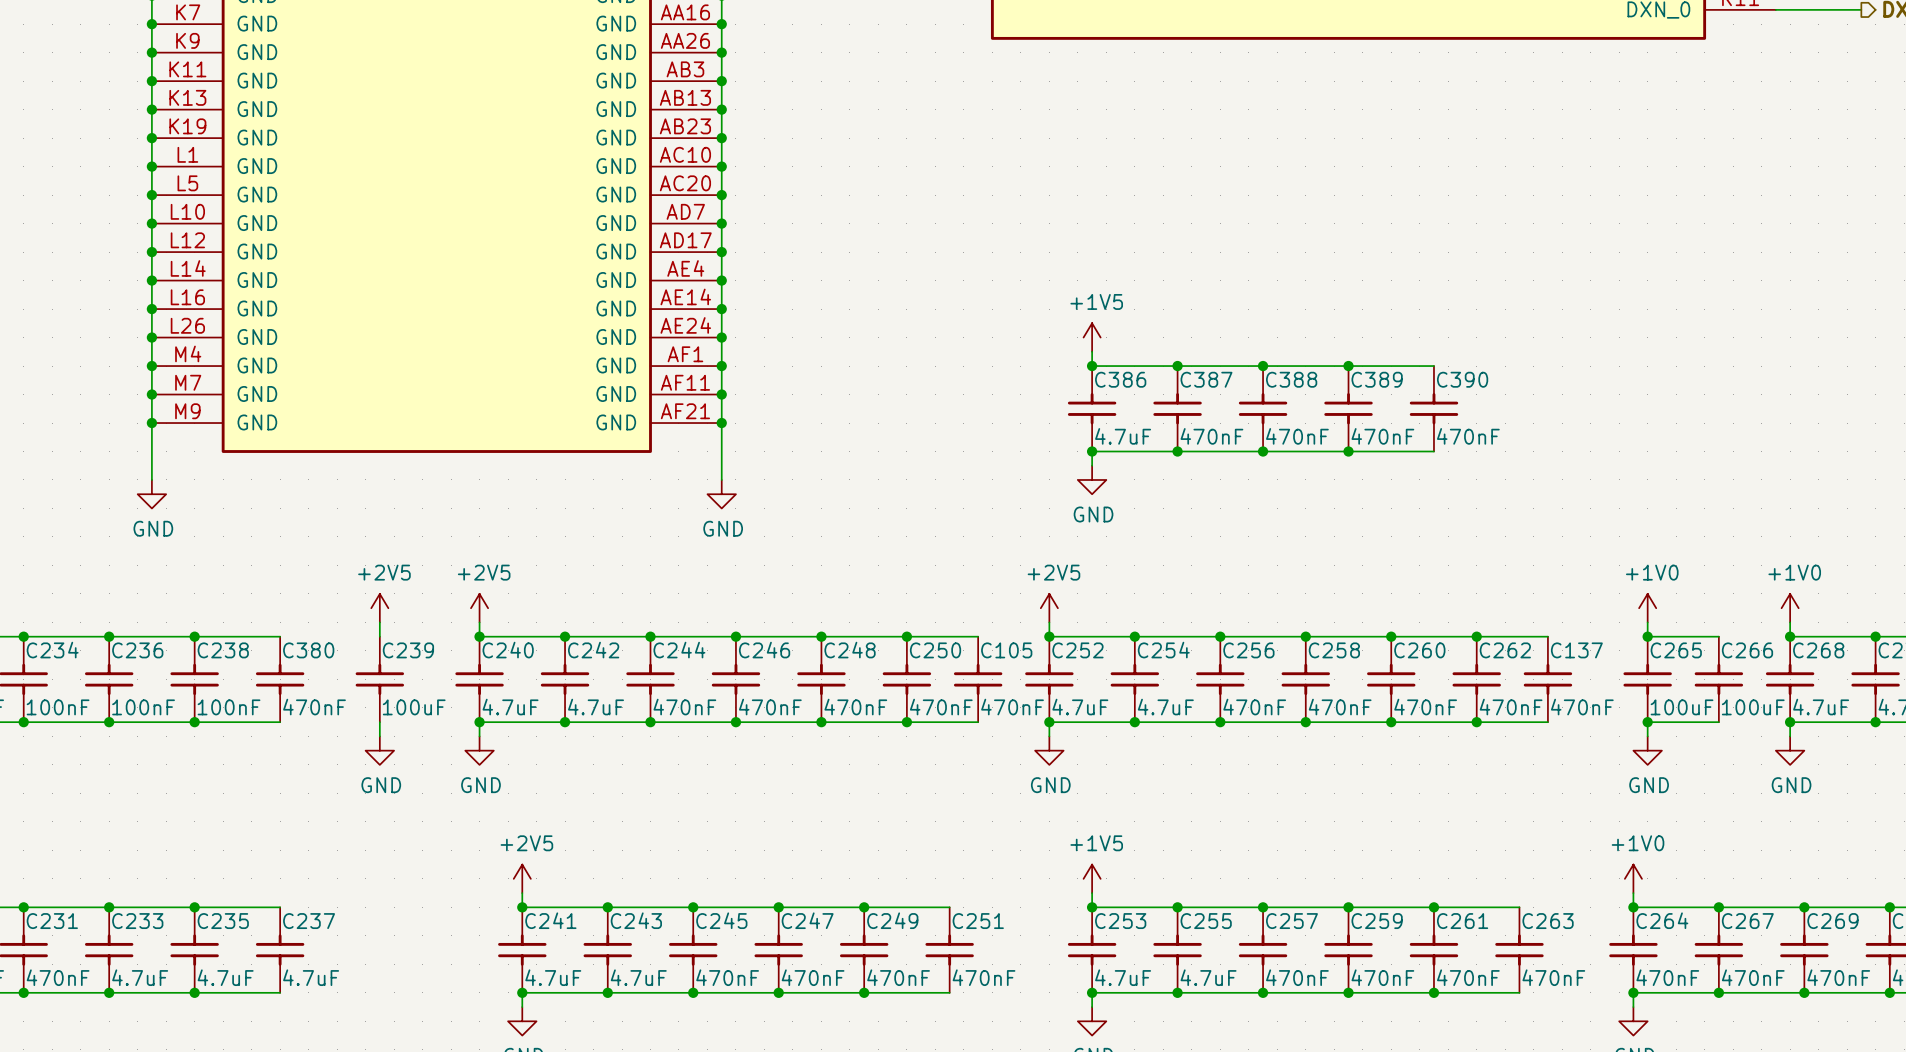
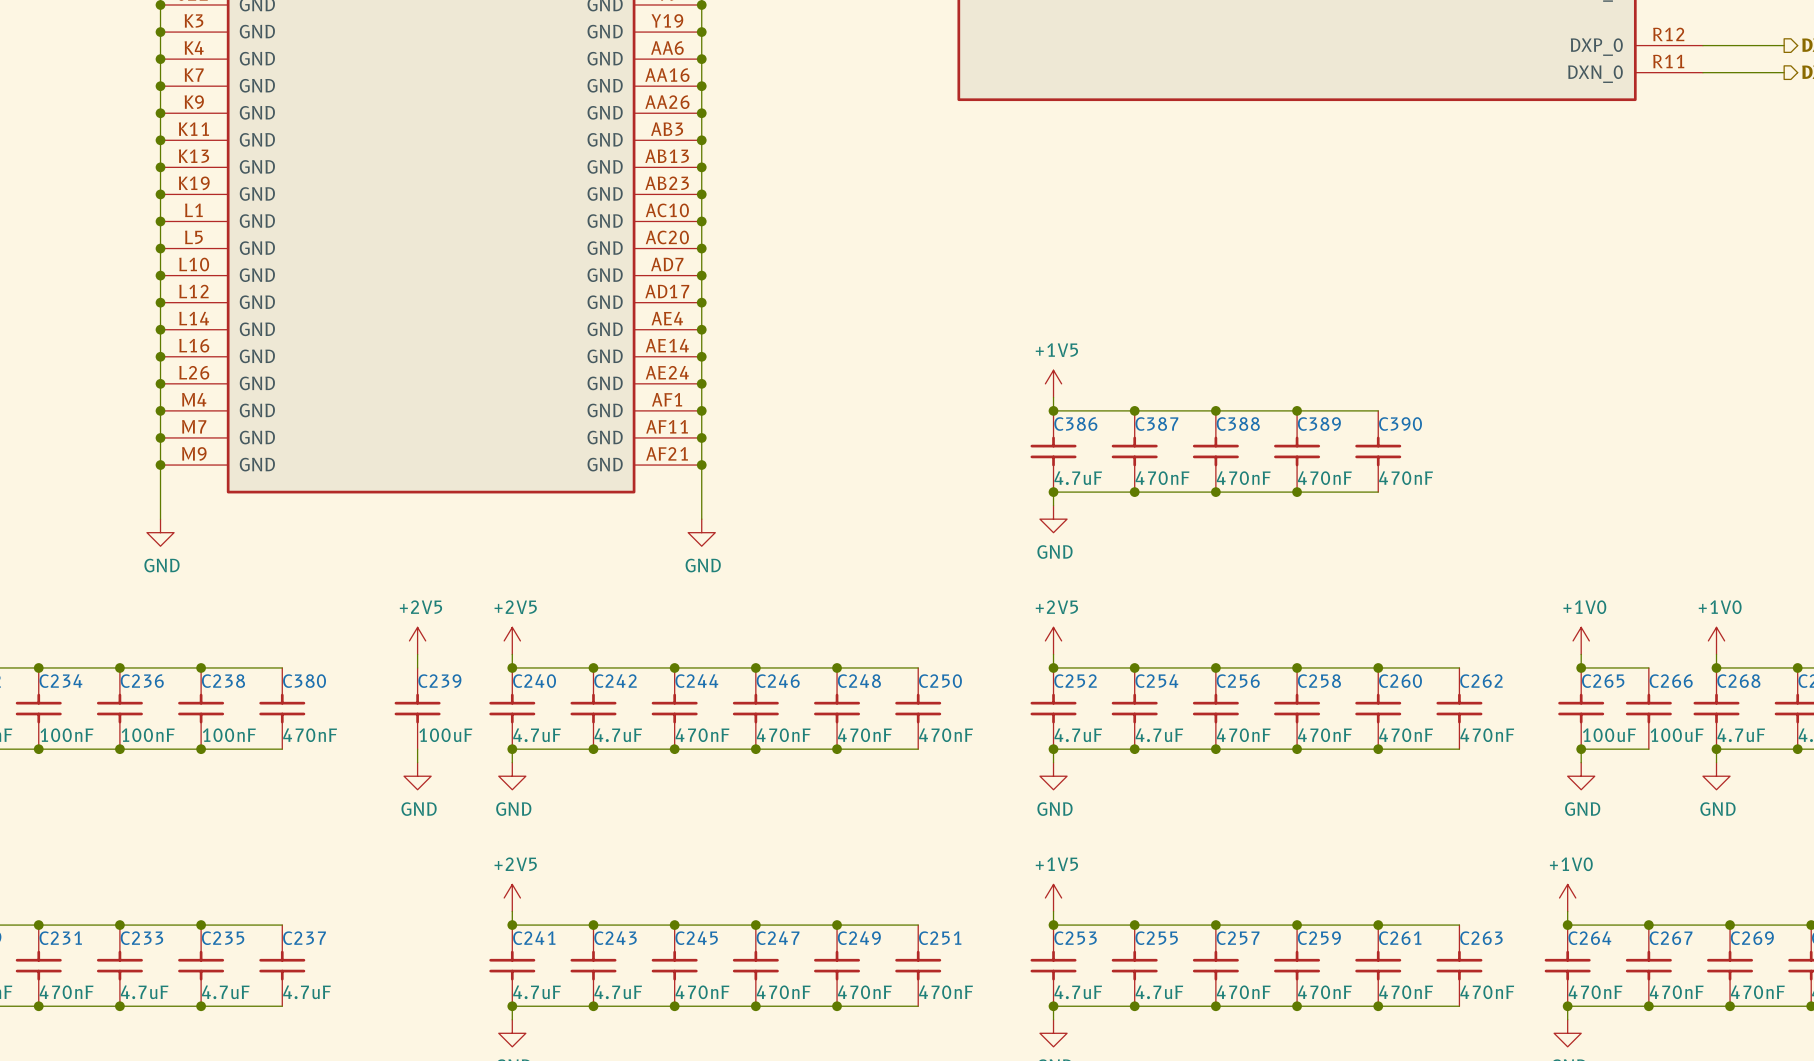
power symbol: +2V5 (379, 608) -> none
power symbol: none -> +2V5 (417, 640)
power symbol: +2V5 (479, 608) -> none
power symbol: none -> +2V5 (512, 640)
power symbol position: +2V5 (1049, 608) -> +2V5 (1053, 640)
wire: (379, 622) (379, 636) -> (417, 654) (417, 667)
wire: (479, 622) (479, 636) (522, 636) -> (512, 654) (512, 667)
wire: (1049, 622) (1049, 636) (1092, 636) -> (1053, 654) (1053, 667)
junction: (479, 636) -> none
junction: none -> (512, 667)
junction: (565, 636) -> none
junction: none -> (593, 667)
junction: (650, 636) -> none
junction: none -> (674, 667)
junction: (735, 636) -> none
junction: none -> (755, 667)
junction: (821, 636) -> none
junction: none -> (837, 667)
junction: (906, 636) -> none
wire: (949, 636) (978, 636) -> none
junction: (1049, 636) -> none
junction: none -> (1053, 667)
junction: (1134, 636) -> none
junction: none -> (1134, 667)
junction: (1220, 636) -> none
junction: none -> (1215, 667)
junction: (1305, 636) -> none
junction: none -> (1297, 667)
junction: (1391, 636) -> none
junction: none -> (1378, 667)
junction: (1476, 636) -> none
wire: (1519, 636) (1547, 636) -> none
C239 position: (379, 679) -> (417, 708)
C240 position: (479, 679) -> (512, 708)
C242 position: (565, 679) -> (593, 708)
C244 position: (650, 679) -> (674, 708)
C246 position: (735, 679) -> (755, 708)
C248 position: (821, 679) -> (837, 708)
C250 position: (906, 679) -> (918, 708)
C105: (978, 679) -> none
C252 position: (1049, 679) -> (1053, 708)
C254 position: (1134, 679) -> (1134, 708)
C256 position: (1220, 679) -> (1215, 708)
C258 position: (1305, 679) -> (1297, 708)
C260 position: (1391, 679) -> (1378, 708)
C262 position: (1476, 679) -> (1459, 708)
C137: (1547, 679) -> none
wire: (379, 722) (379, 736) -> (417, 749) (417, 762)
junction: (479, 722) -> none
wire: (522, 722) (479, 722) (479, 736) -> (512, 749) (512, 762)
junction: none -> (512, 749)
junction: (565, 722) -> none
junction: none -> (593, 749)
junction: (650, 722) -> none
junction: none -> (674, 749)
junction: (735, 722) -> none
junction: none -> (755, 749)
junction: (821, 722) -> none
junction: none -> (837, 749)
junction: (906, 722) -> none
wire: (949, 722) (978, 722) -> none
junction: (1049, 722) -> none
wire: (1092, 722) (1049, 722) (1049, 736) -> (1053, 749) (1053, 762)
junction: none -> (1053, 749)
junction: (1134, 722) -> none
junction: none -> (1134, 749)
junction: (1220, 722) -> none
junction: none -> (1215, 749)
junction: (1305, 722) -> none
junction: none -> (1297, 749)
junction: (1391, 722) -> none
junction: none -> (1378, 749)
junction: (1476, 722) -> none
wire: (1519, 722) (1547, 722) -> none
power symbol: GND (379, 750) -> none
power symbol: none -> GND (417, 776)
power symbol: GND (479, 750) -> none
power symbol: none -> GND (512, 776)
power symbol position: GND (1049, 750) -> GND (1053, 776)

